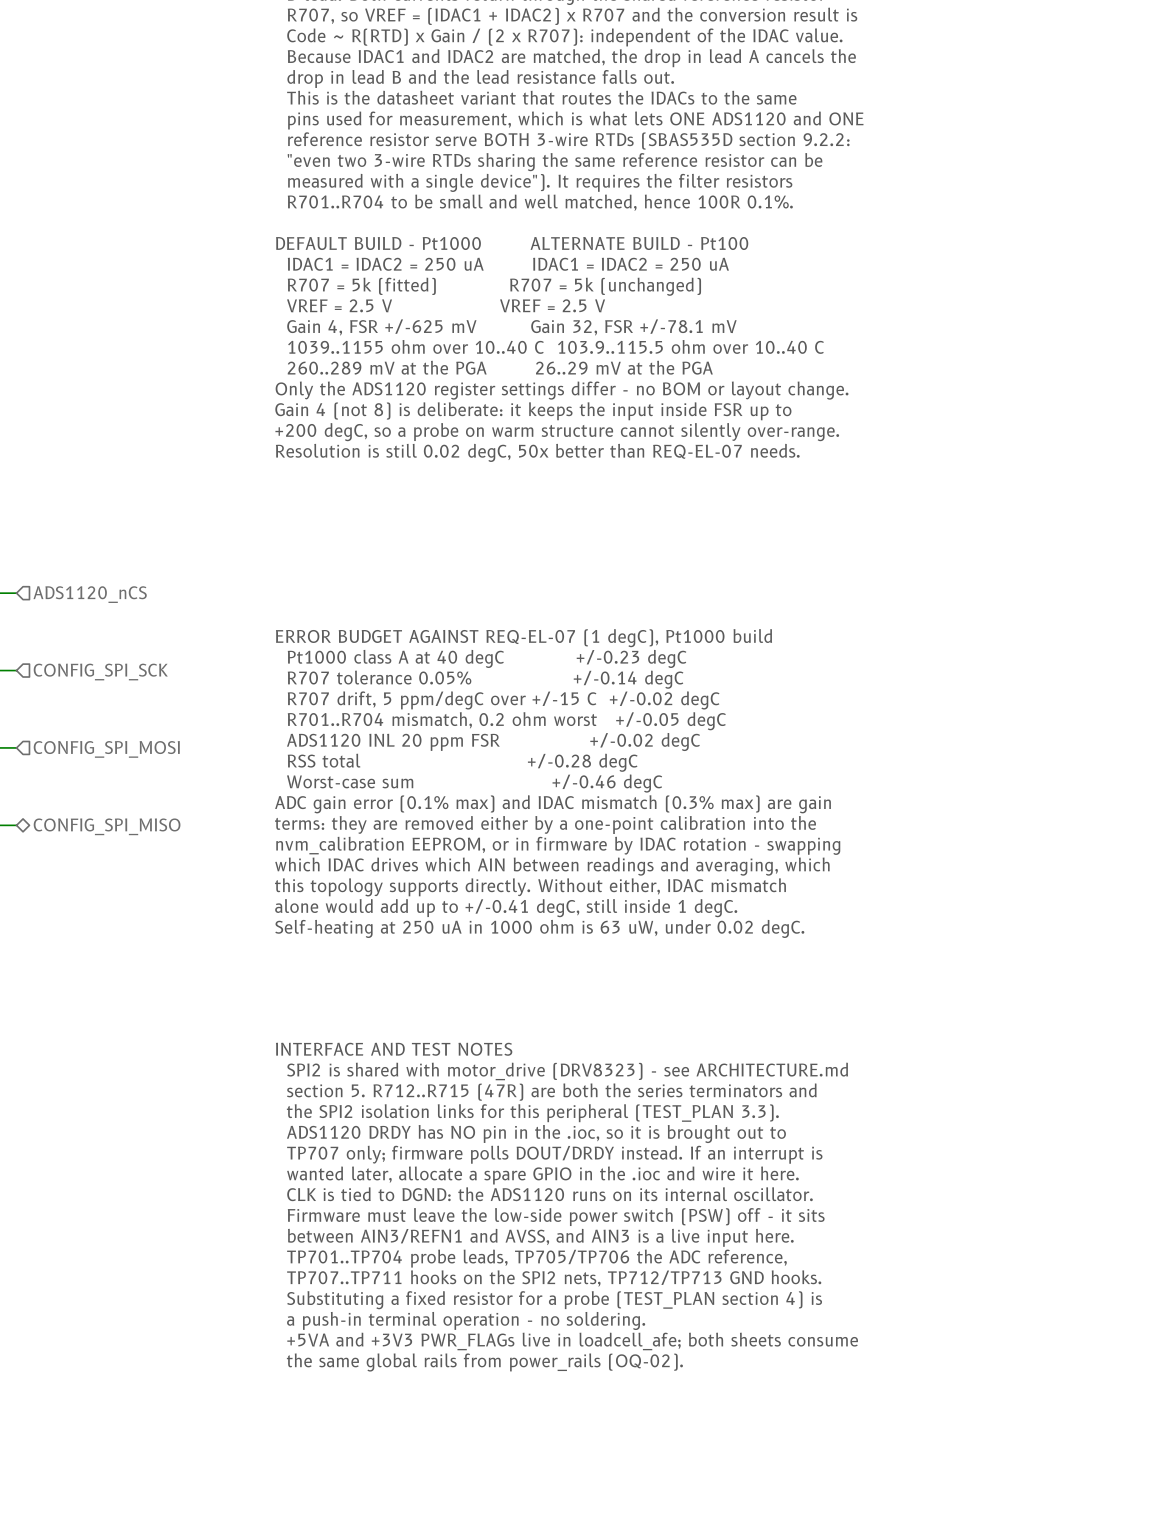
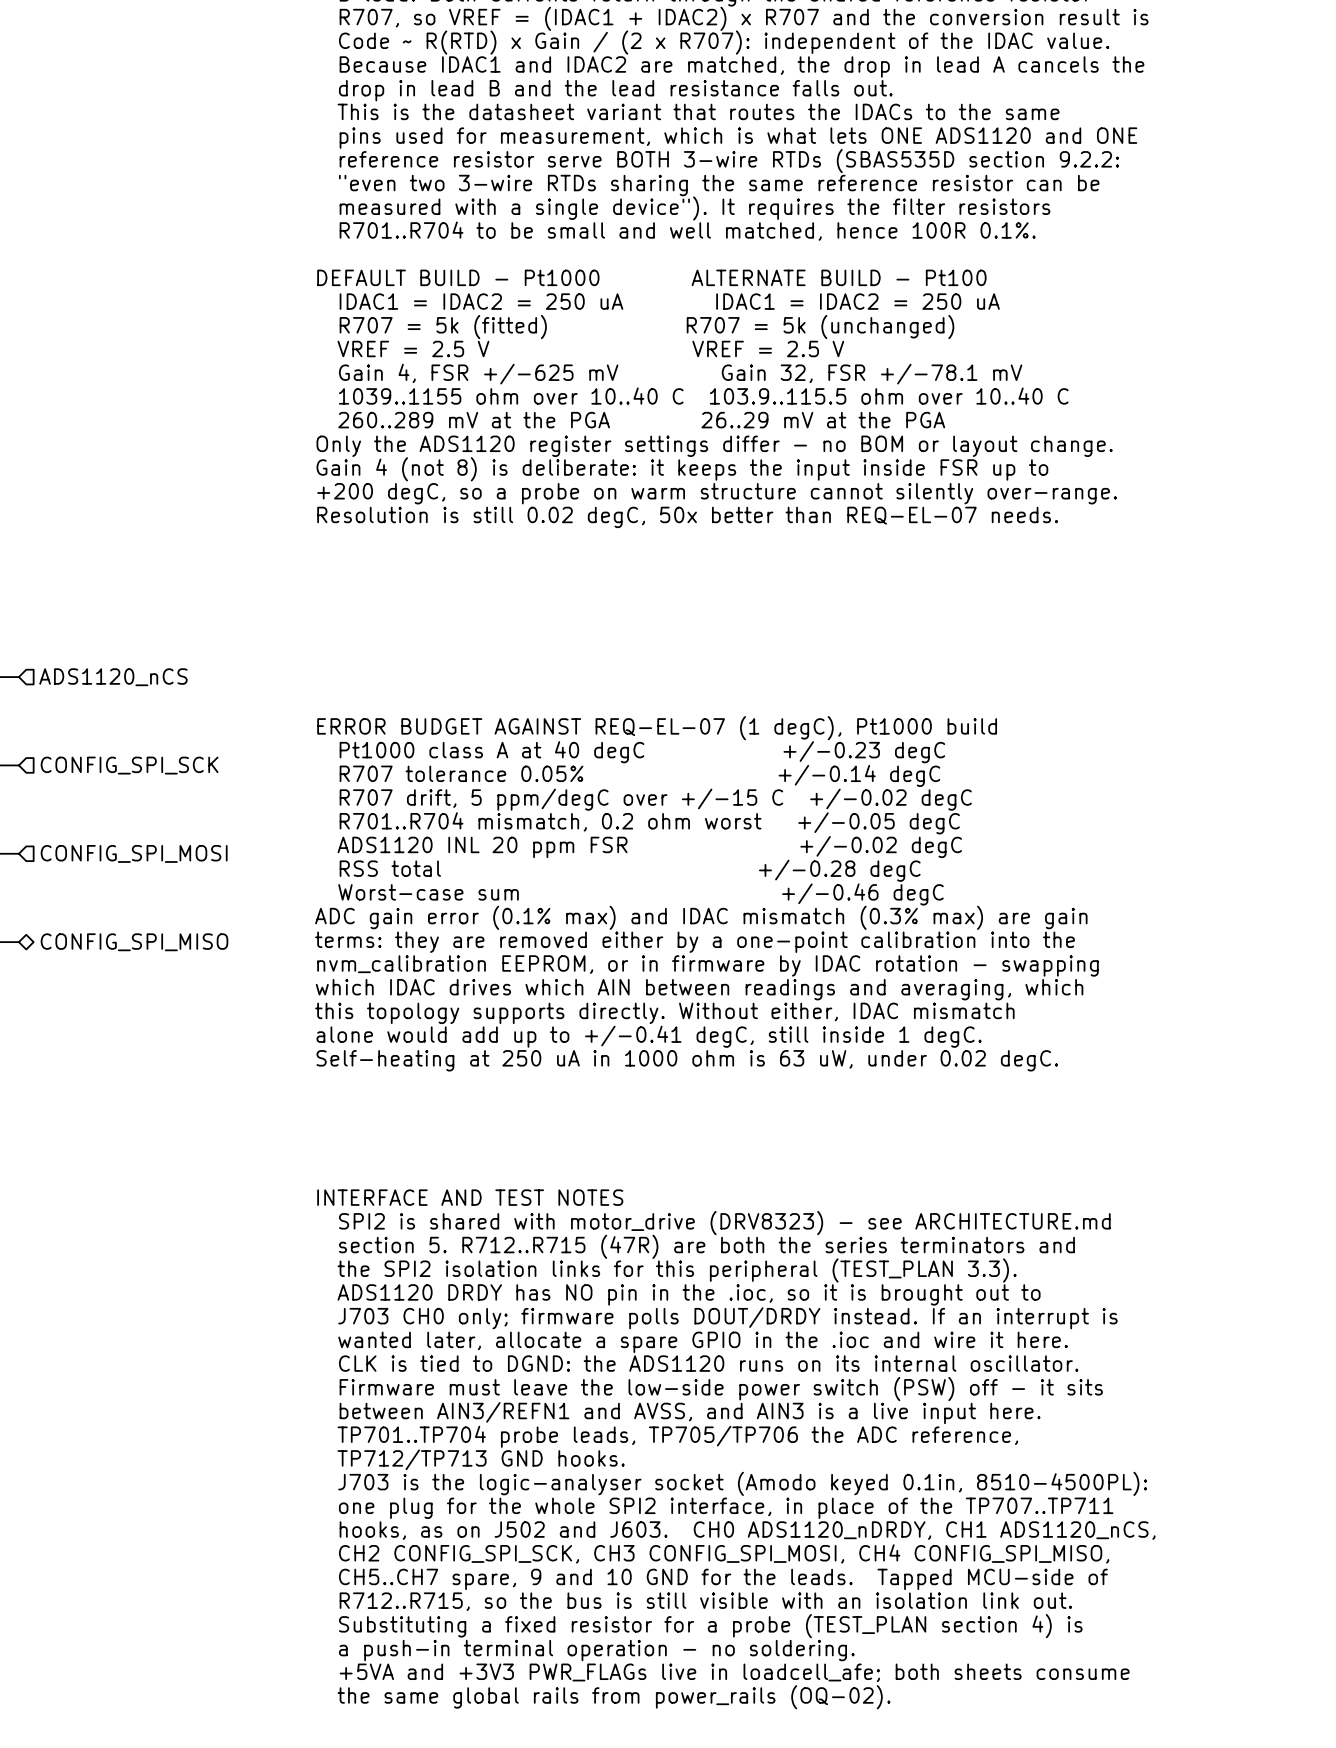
text: TP707 only; firmware polls DOUT/DRDY instead. If an interrupt is (554, 1154) -> J703 CH0 only; firmware polls DOUT/DRDY instead. If an interrupt is (727, 1318)
text: TP707..TP711 hooks on the SPI2 nets, TP712/TP713 GND hooks. (554, 1278) -> TP712/TP713 GND hooks. (481, 1459)
text: Substituting a fixed resistor for a probe (TEST_PLAN section 4) is (554, 1300) -> J703 is the logic-analyser socket (Amodo keyed 0.1in, 8510-4500PL): (742, 1483)
text: a push-in terminal operation - no soldering. (466, 1320) -> one plug for the whole SPI2 interface, in place of the TP707..TP711 (726, 1508)
text: +5VA and +3V3 PWR_FLAGs live in loadcell_afe; both sheets consume (572, 1341) -> hooks, as on J502 and J603. CH0 ADS1120_nDRDY, CH1 ADS1120_nCS, (747, 1530)
text: the same global rails from power_rails (OQ-02). (484, 1362) -> CH2 CONFIG_SPI_SCK, CH3 CONFIG_SPI_MOSI, CH4 CONFIG_SPI_MISO, (724, 1553)
text: none -> CH5..CH7 spare, 9 and 10 GND for the leads. Tapped MCU-side of (723, 1579)
text: none -> R712..R715, so the bus is still visible with an isolation link out. (705, 1601)
text: none -> Substituting a fixed resistor for a probe (TEST_PLAN section 4) is (710, 1626)
text: none -> a push-in terminal operation - no soldering. (596, 1650)
text: none -> +5VA and +3V3 PWR_FLAGs live in loadcell_afe; both sheets consume (734, 1672)
text: none -> the same global rails from power_rails (OQ-02). (614, 1697)

